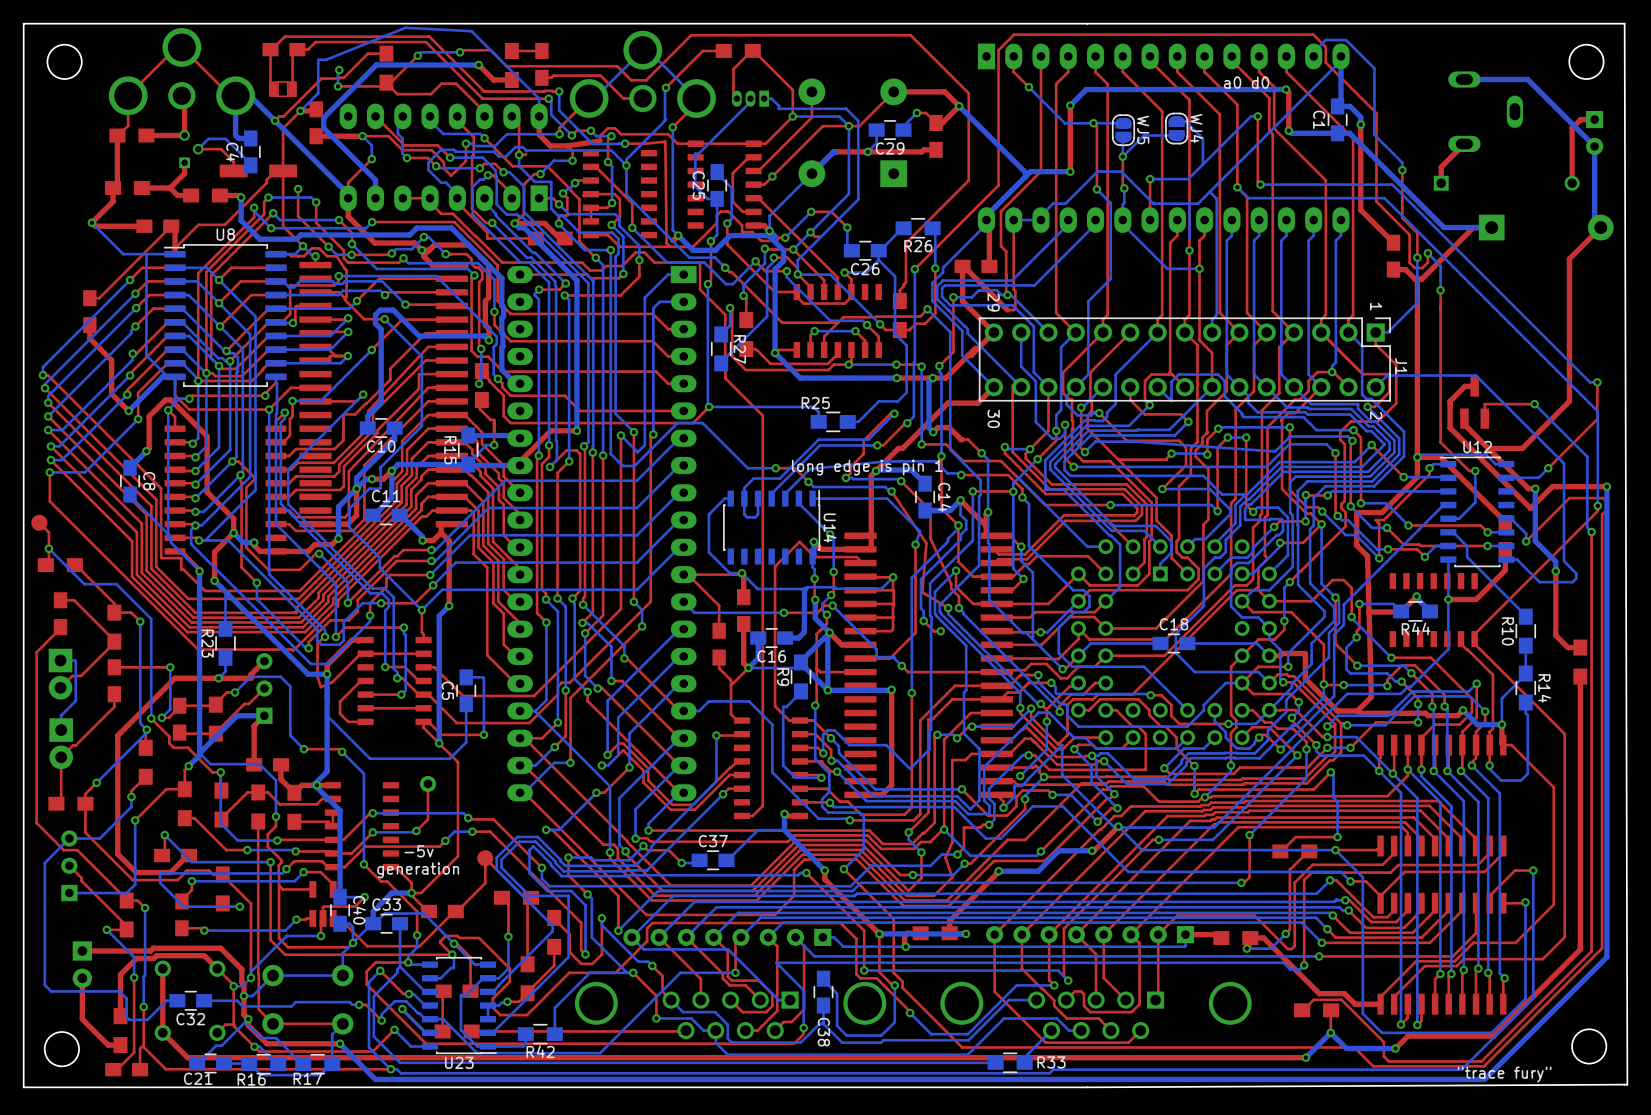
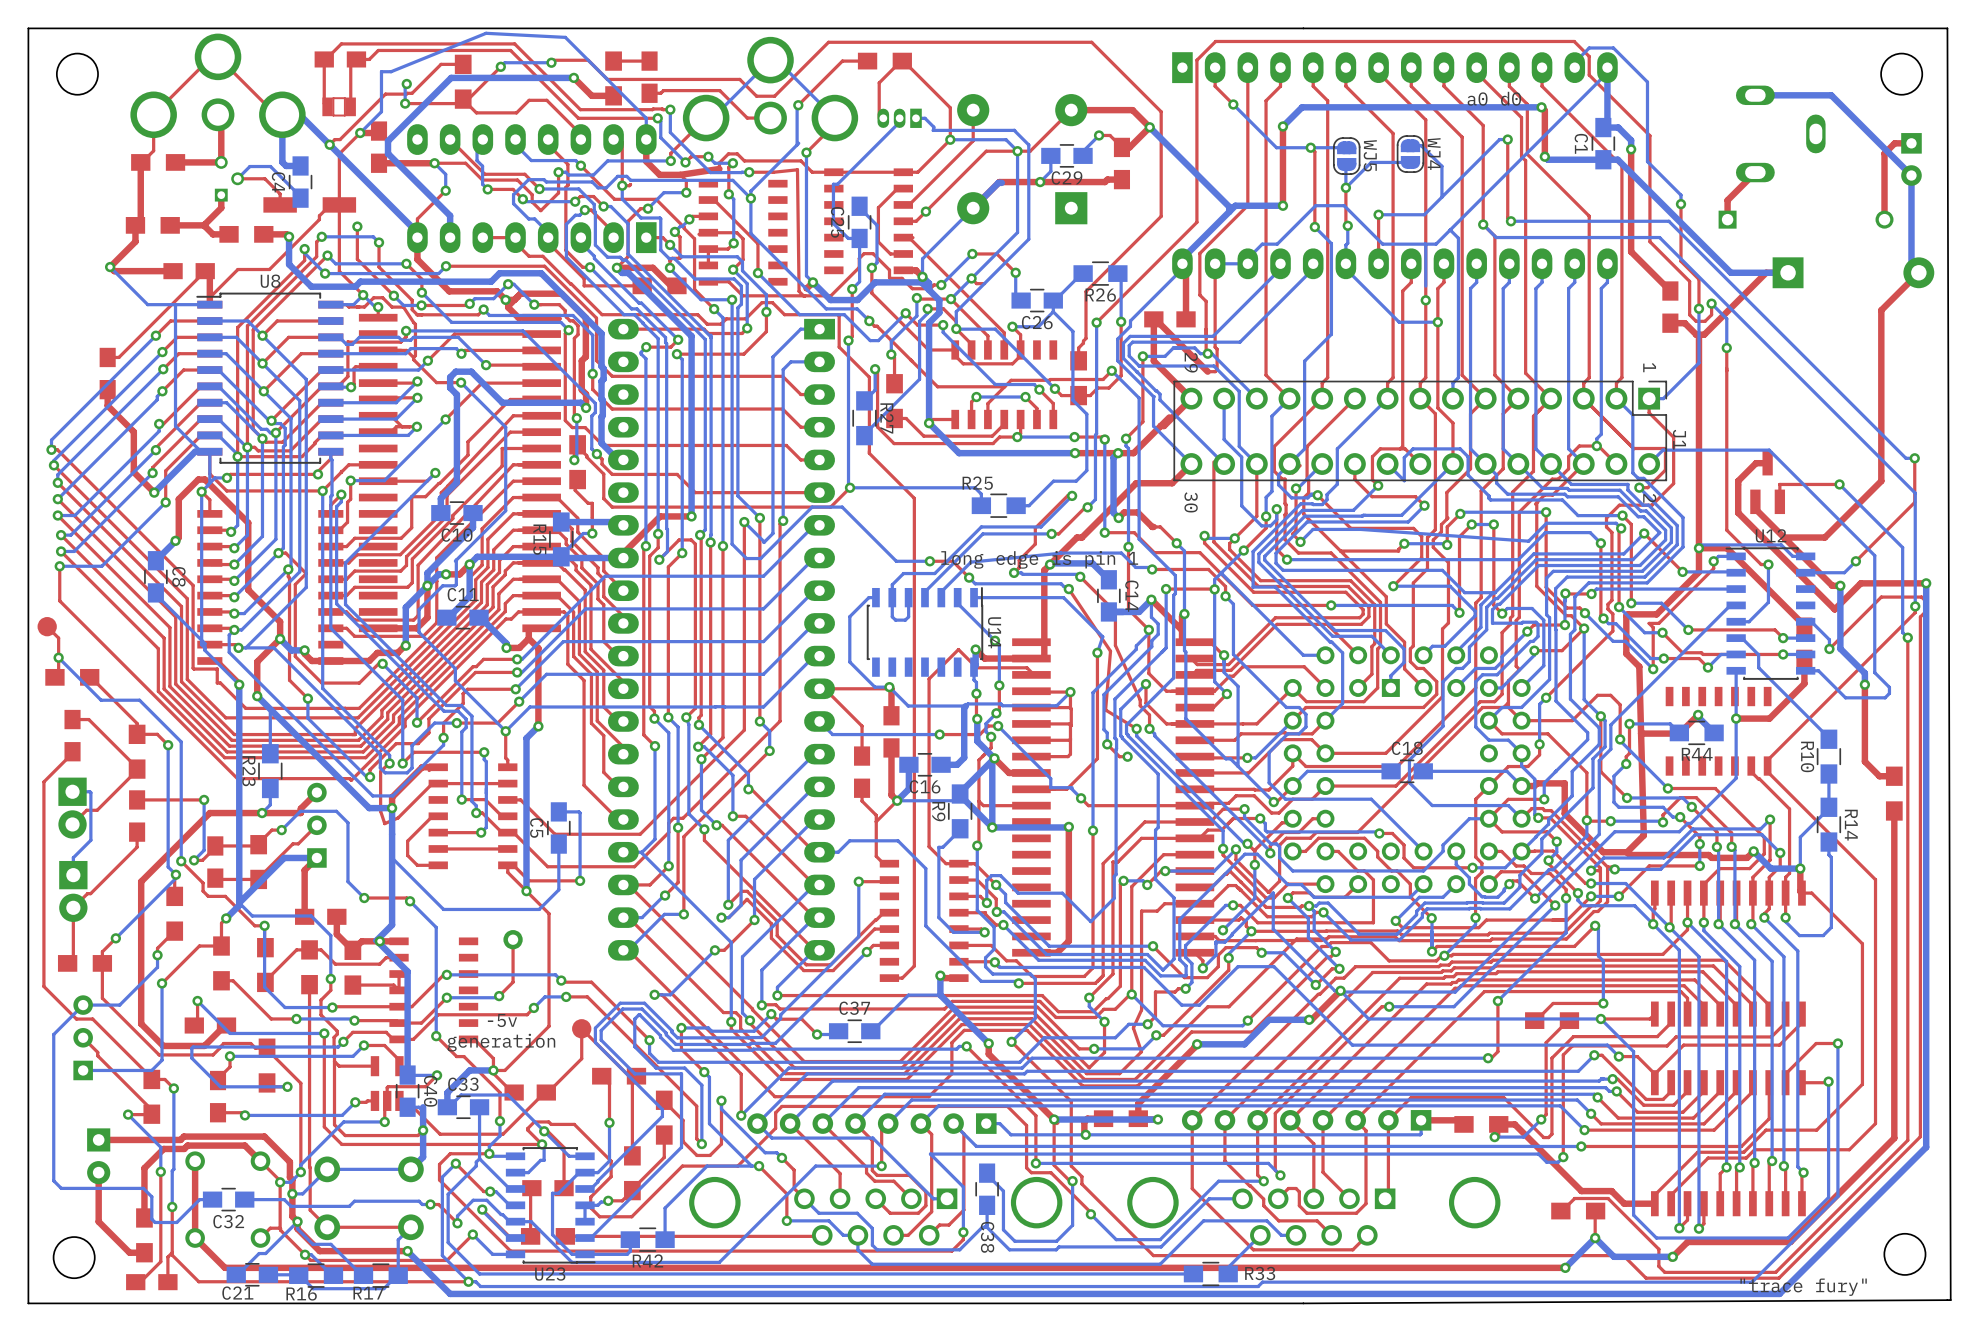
bottom track: (371, 923) (352, 942) -> none
bottom track: (352, 943) (342, 953) (342, 975) -> (423, 1107) (423, 1157) (410, 1169)

